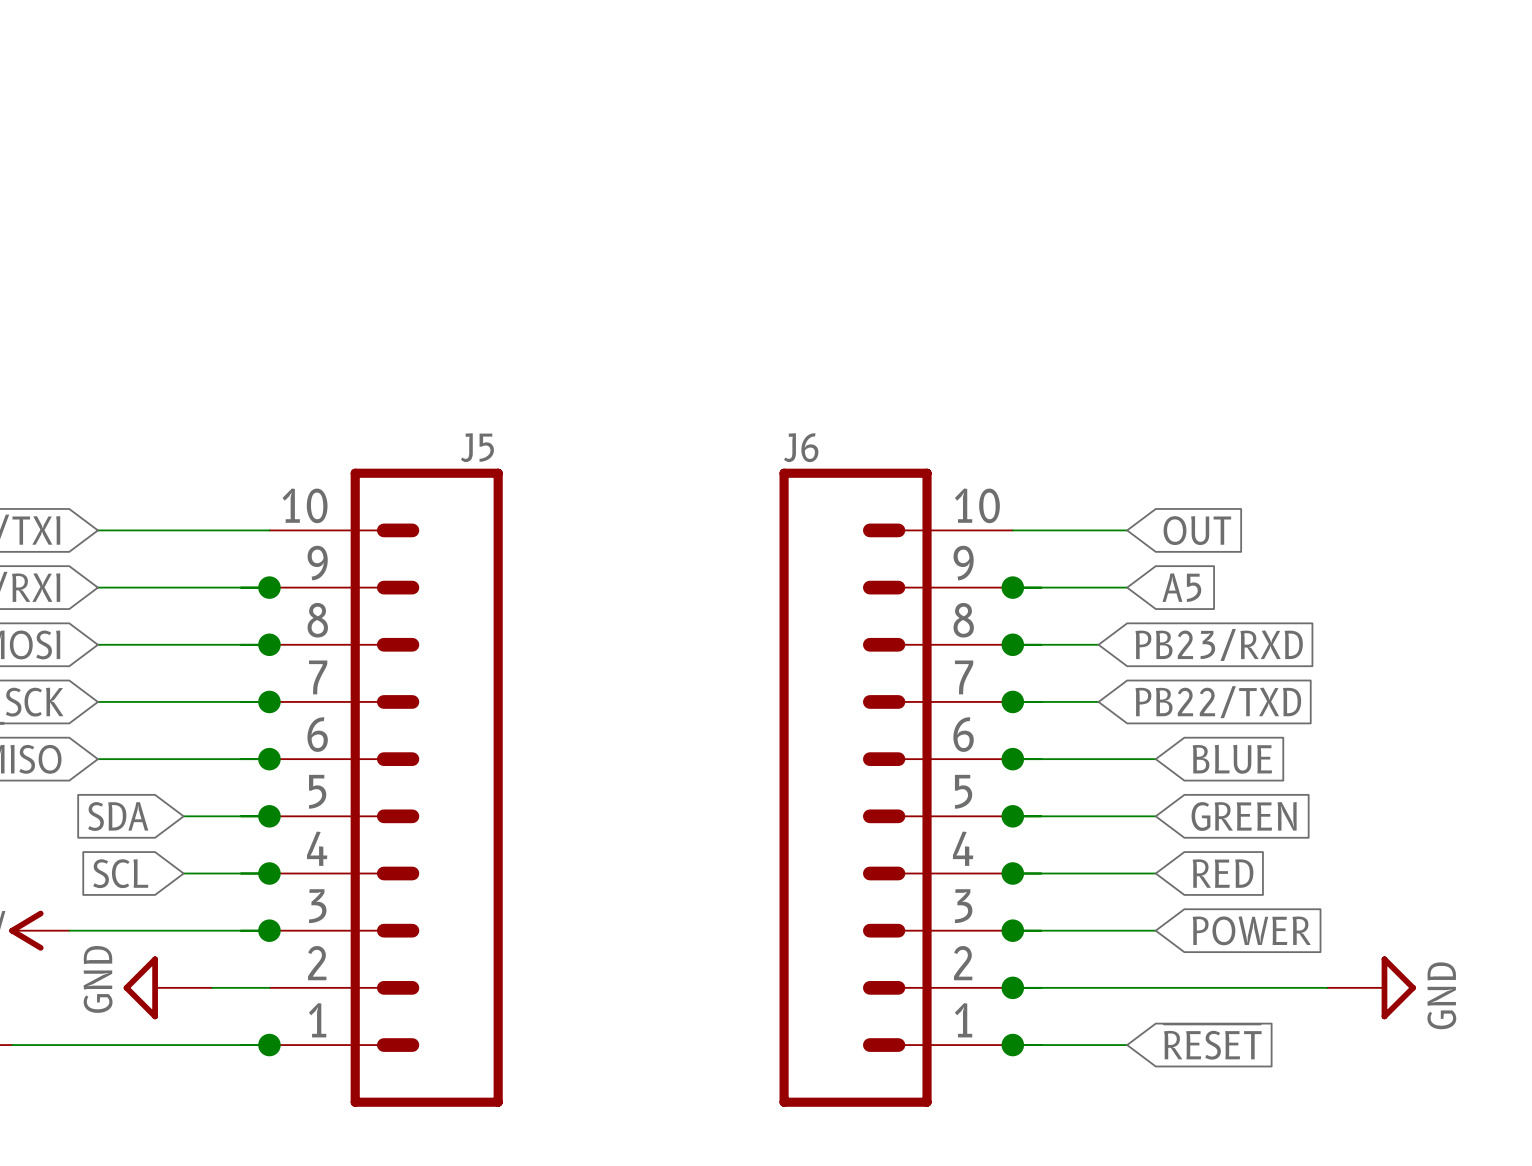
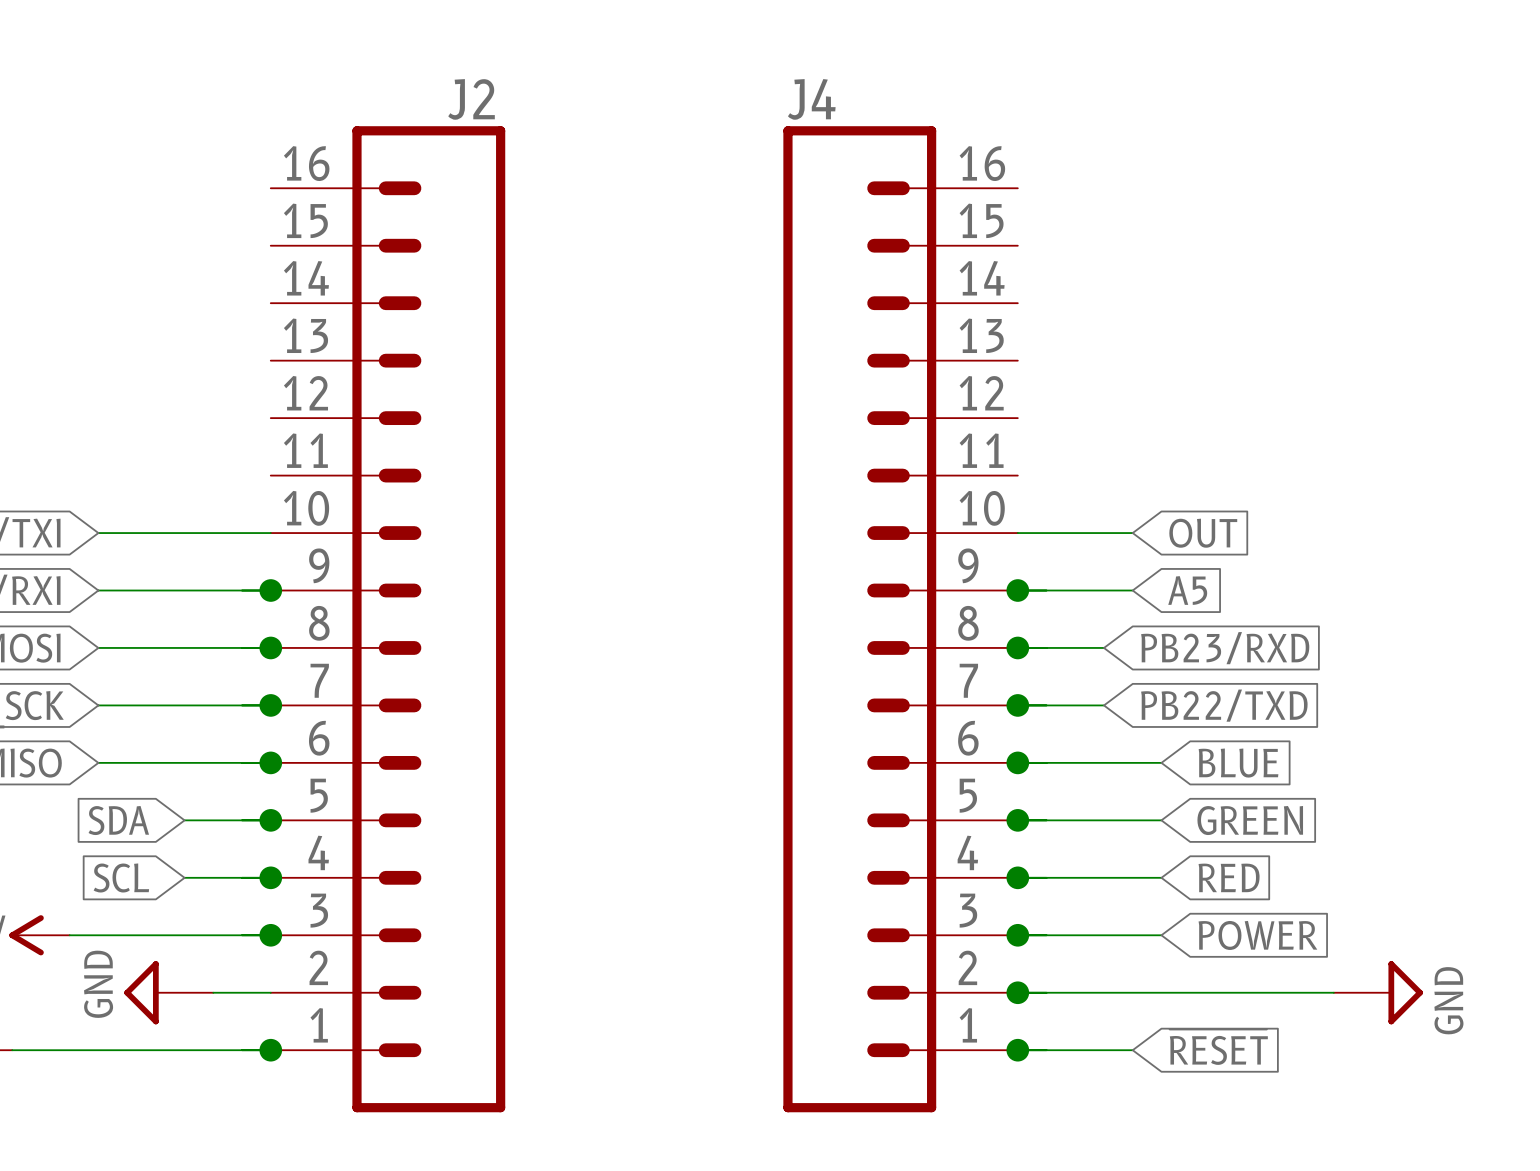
J2: none -> (388, 619)
J4: none -> (900, 619)
J5: (386, 787) -> none
J6: (896, 787) -> none

